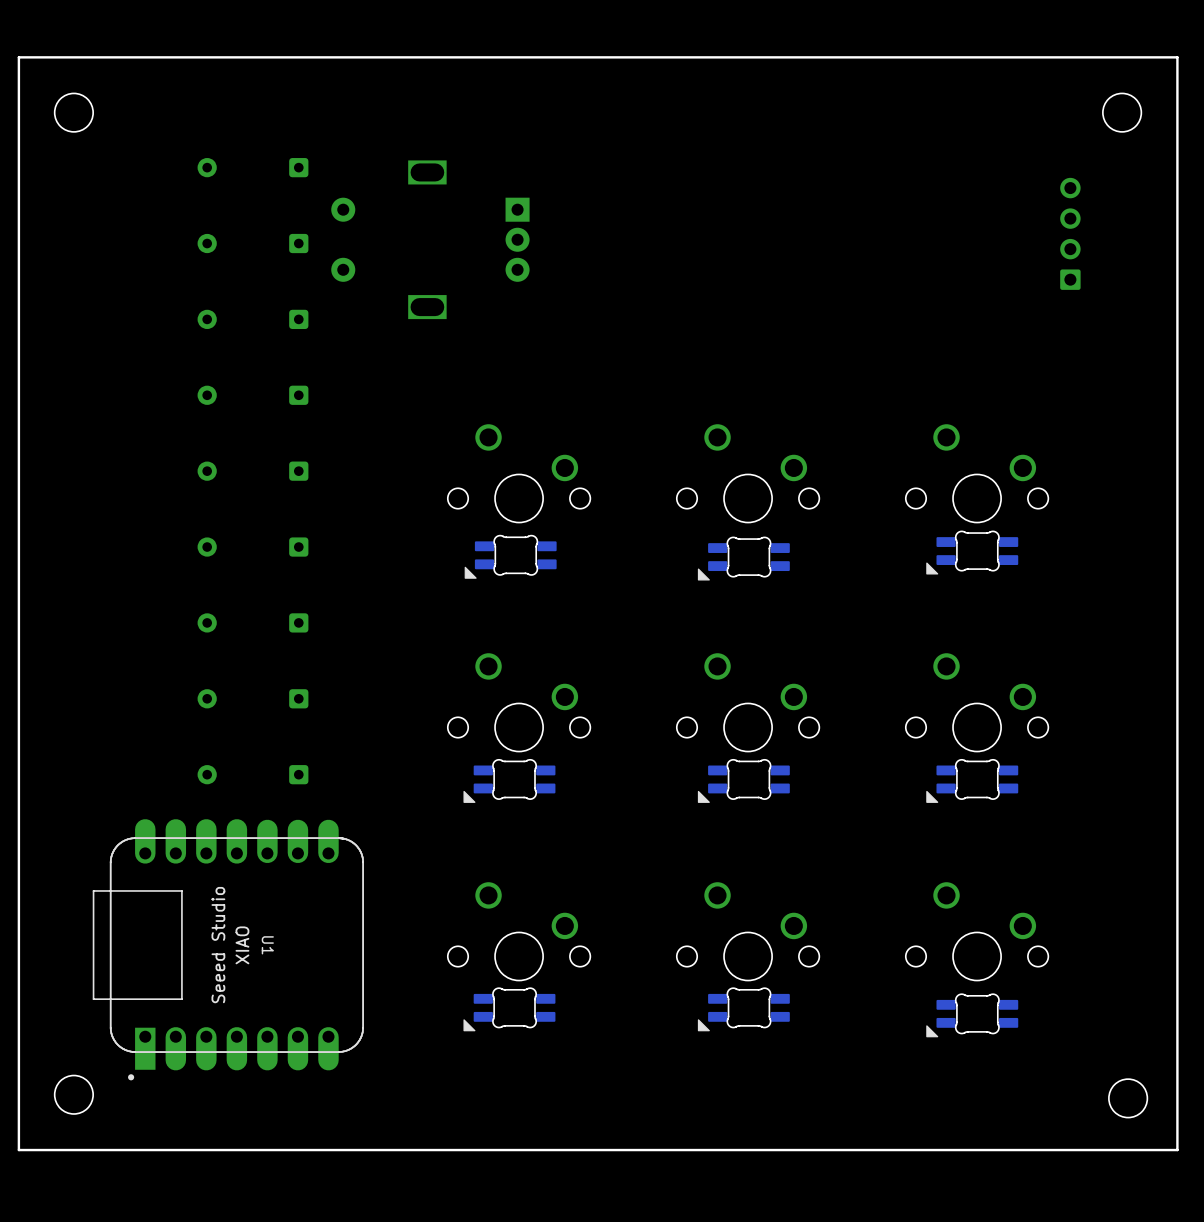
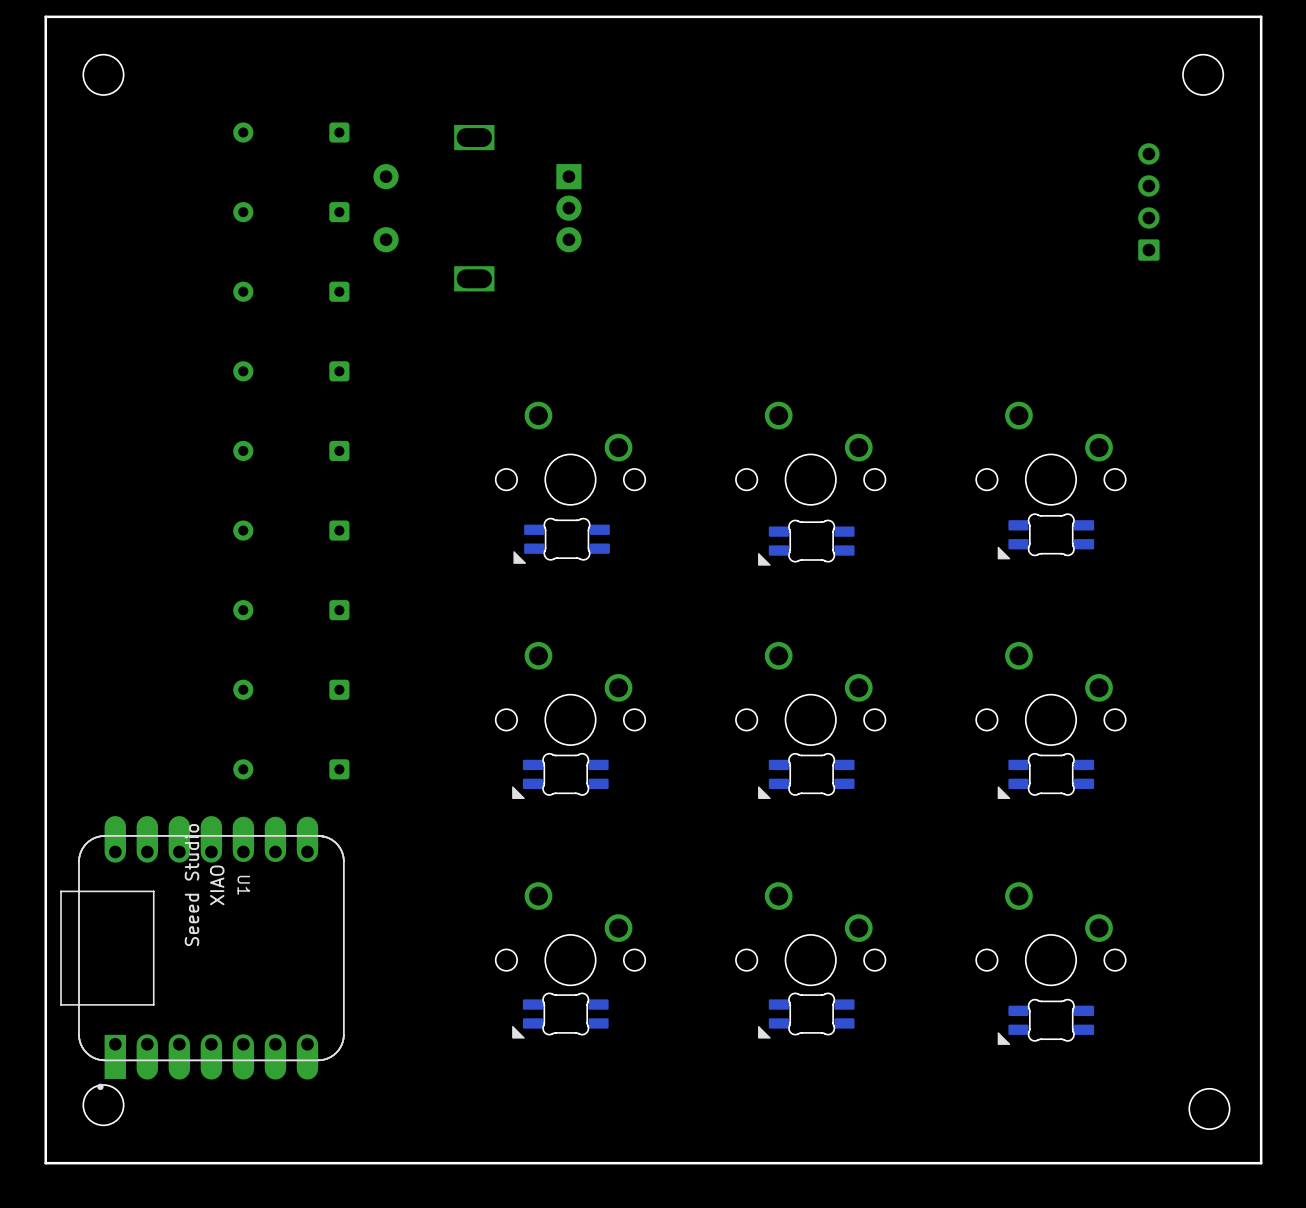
U1 text position: Seeed Studio (218, 945) -> Seeed Studio (191, 885)
U1 text position: XIAO (242, 945) -> XIAO (217, 885)
U1 name position: U1 (267, 945) -> U1 (243, 885)
U1 position: (228, 949) -> (202, 953)

